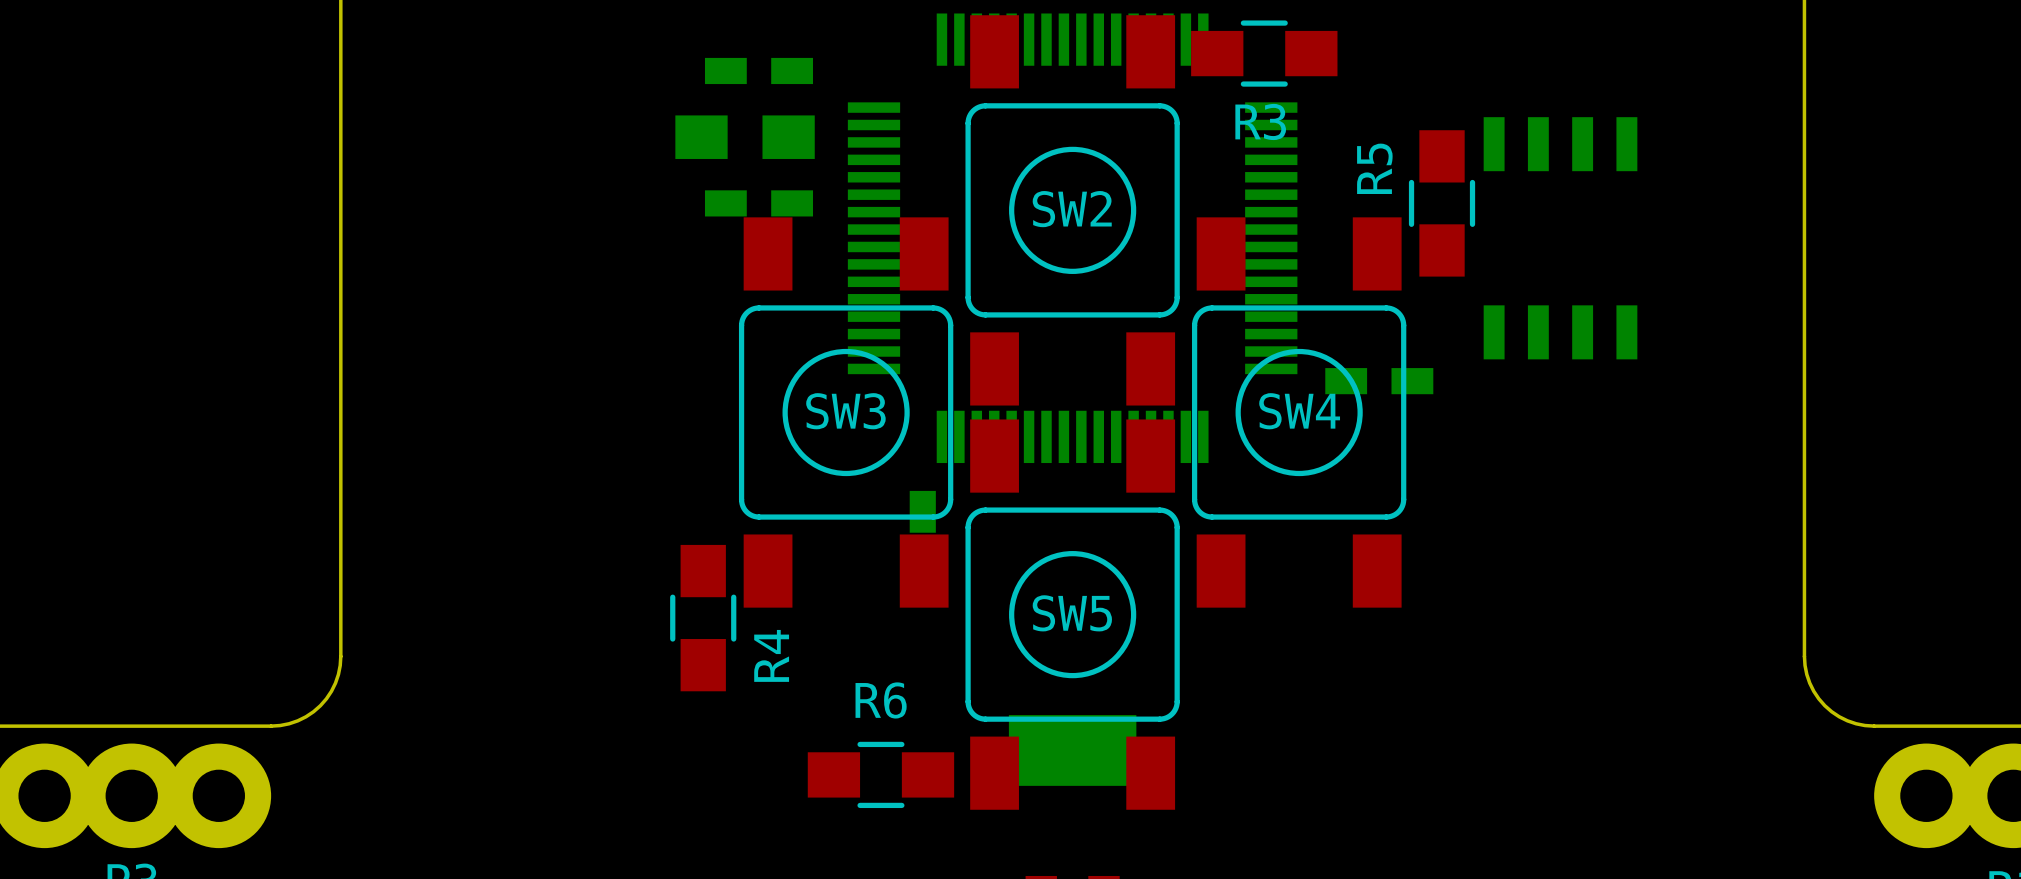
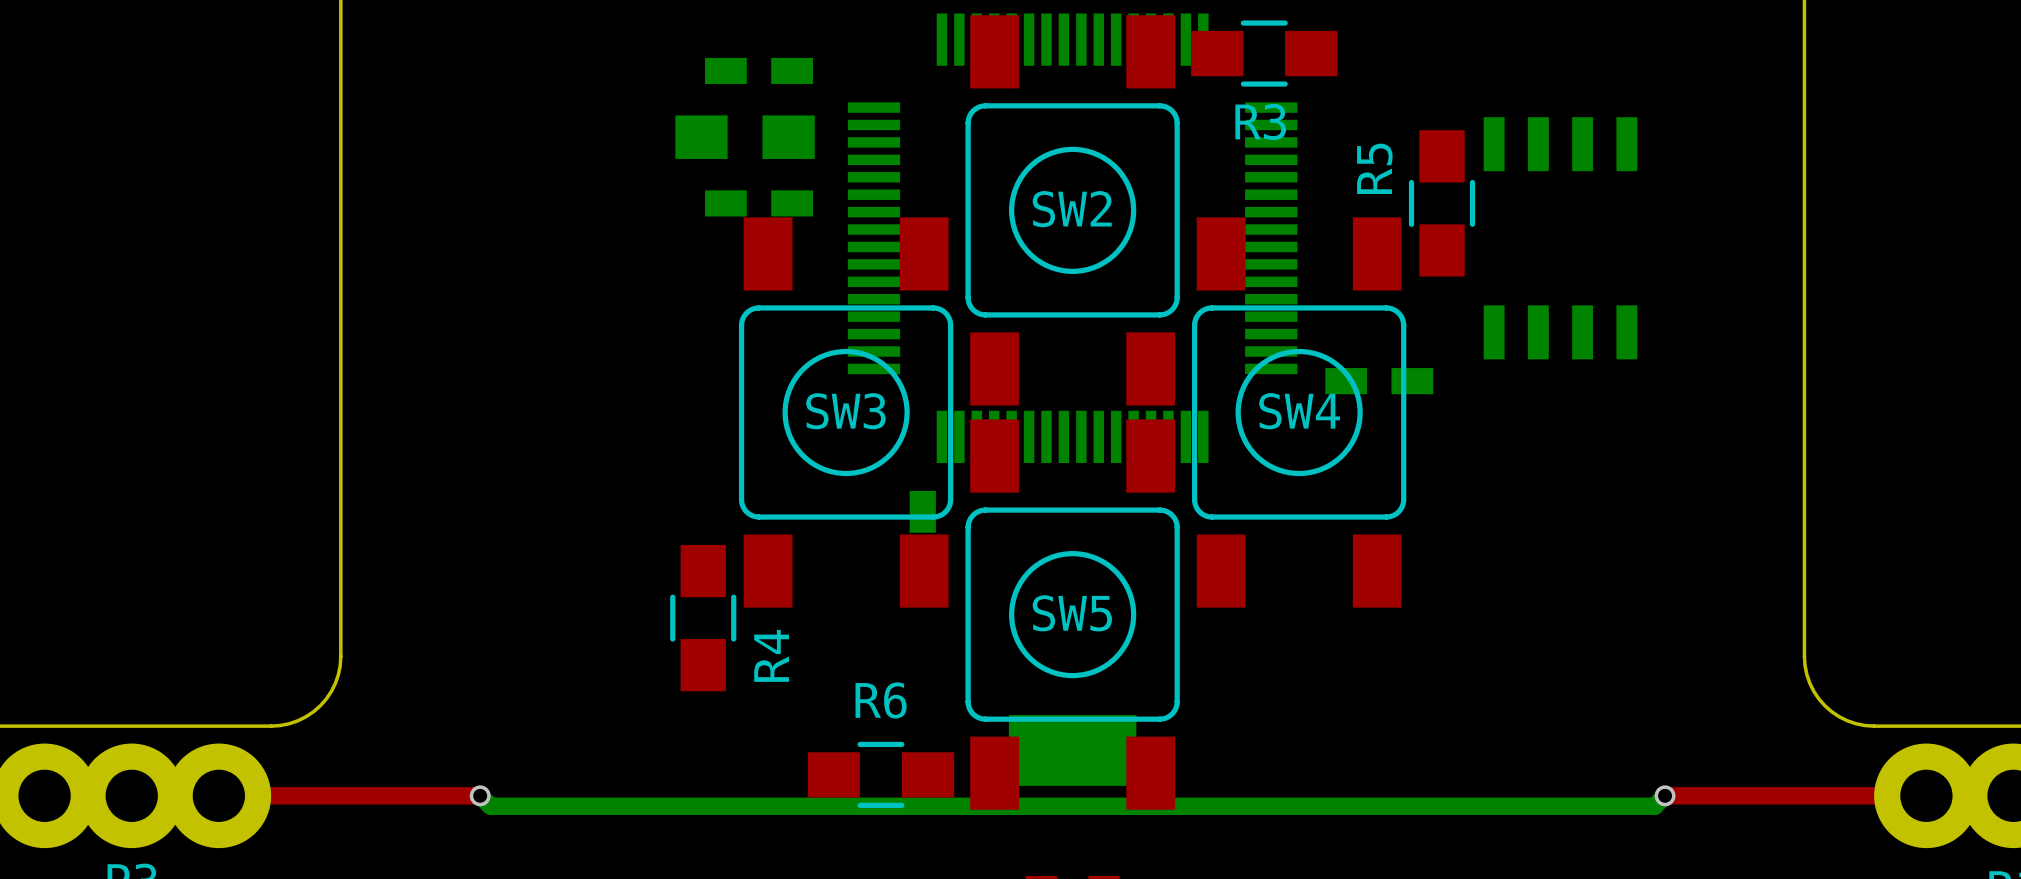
top track: none -> (218, 795) (480, 795)
bottom track: none -> (480, 795) (490, 806) (1654, 806) (1665, 795)
via: none -> (480, 795)
top track: none -> (1665, 795) (1926, 795)
via: none -> (1665, 795)

